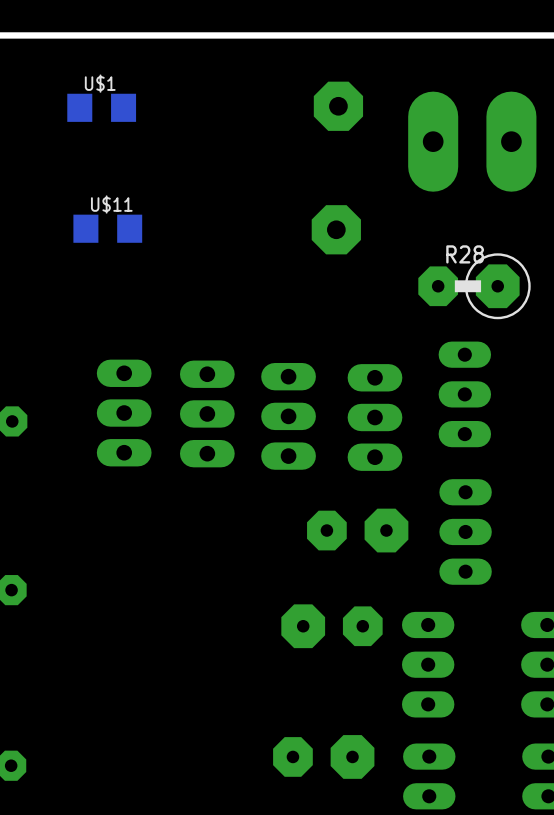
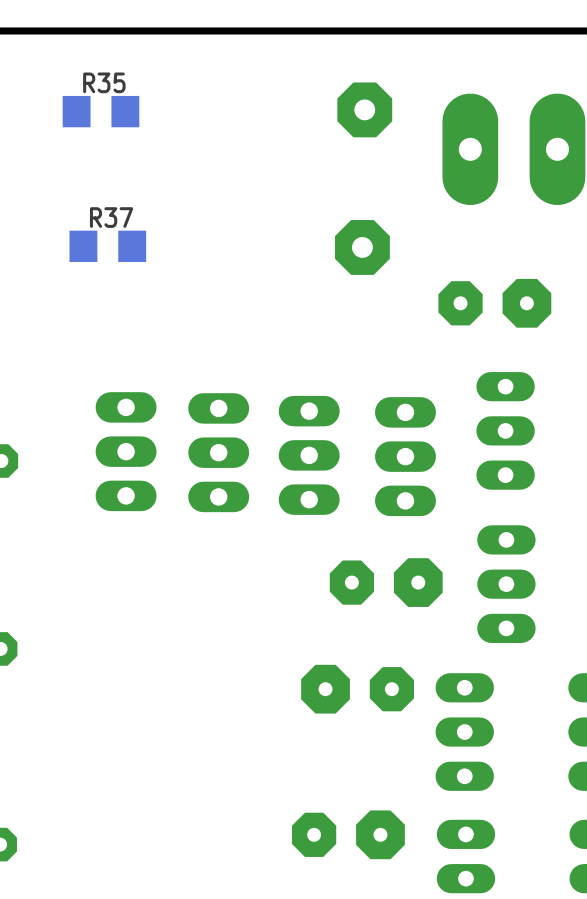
U$1 name: U$1 (100, 83) -> R35 (104, 82)
U$11 name: U$11 (111, 204) -> R37 (111, 217)
R28 side: bottom (474, 286) -> top (494, 303)

